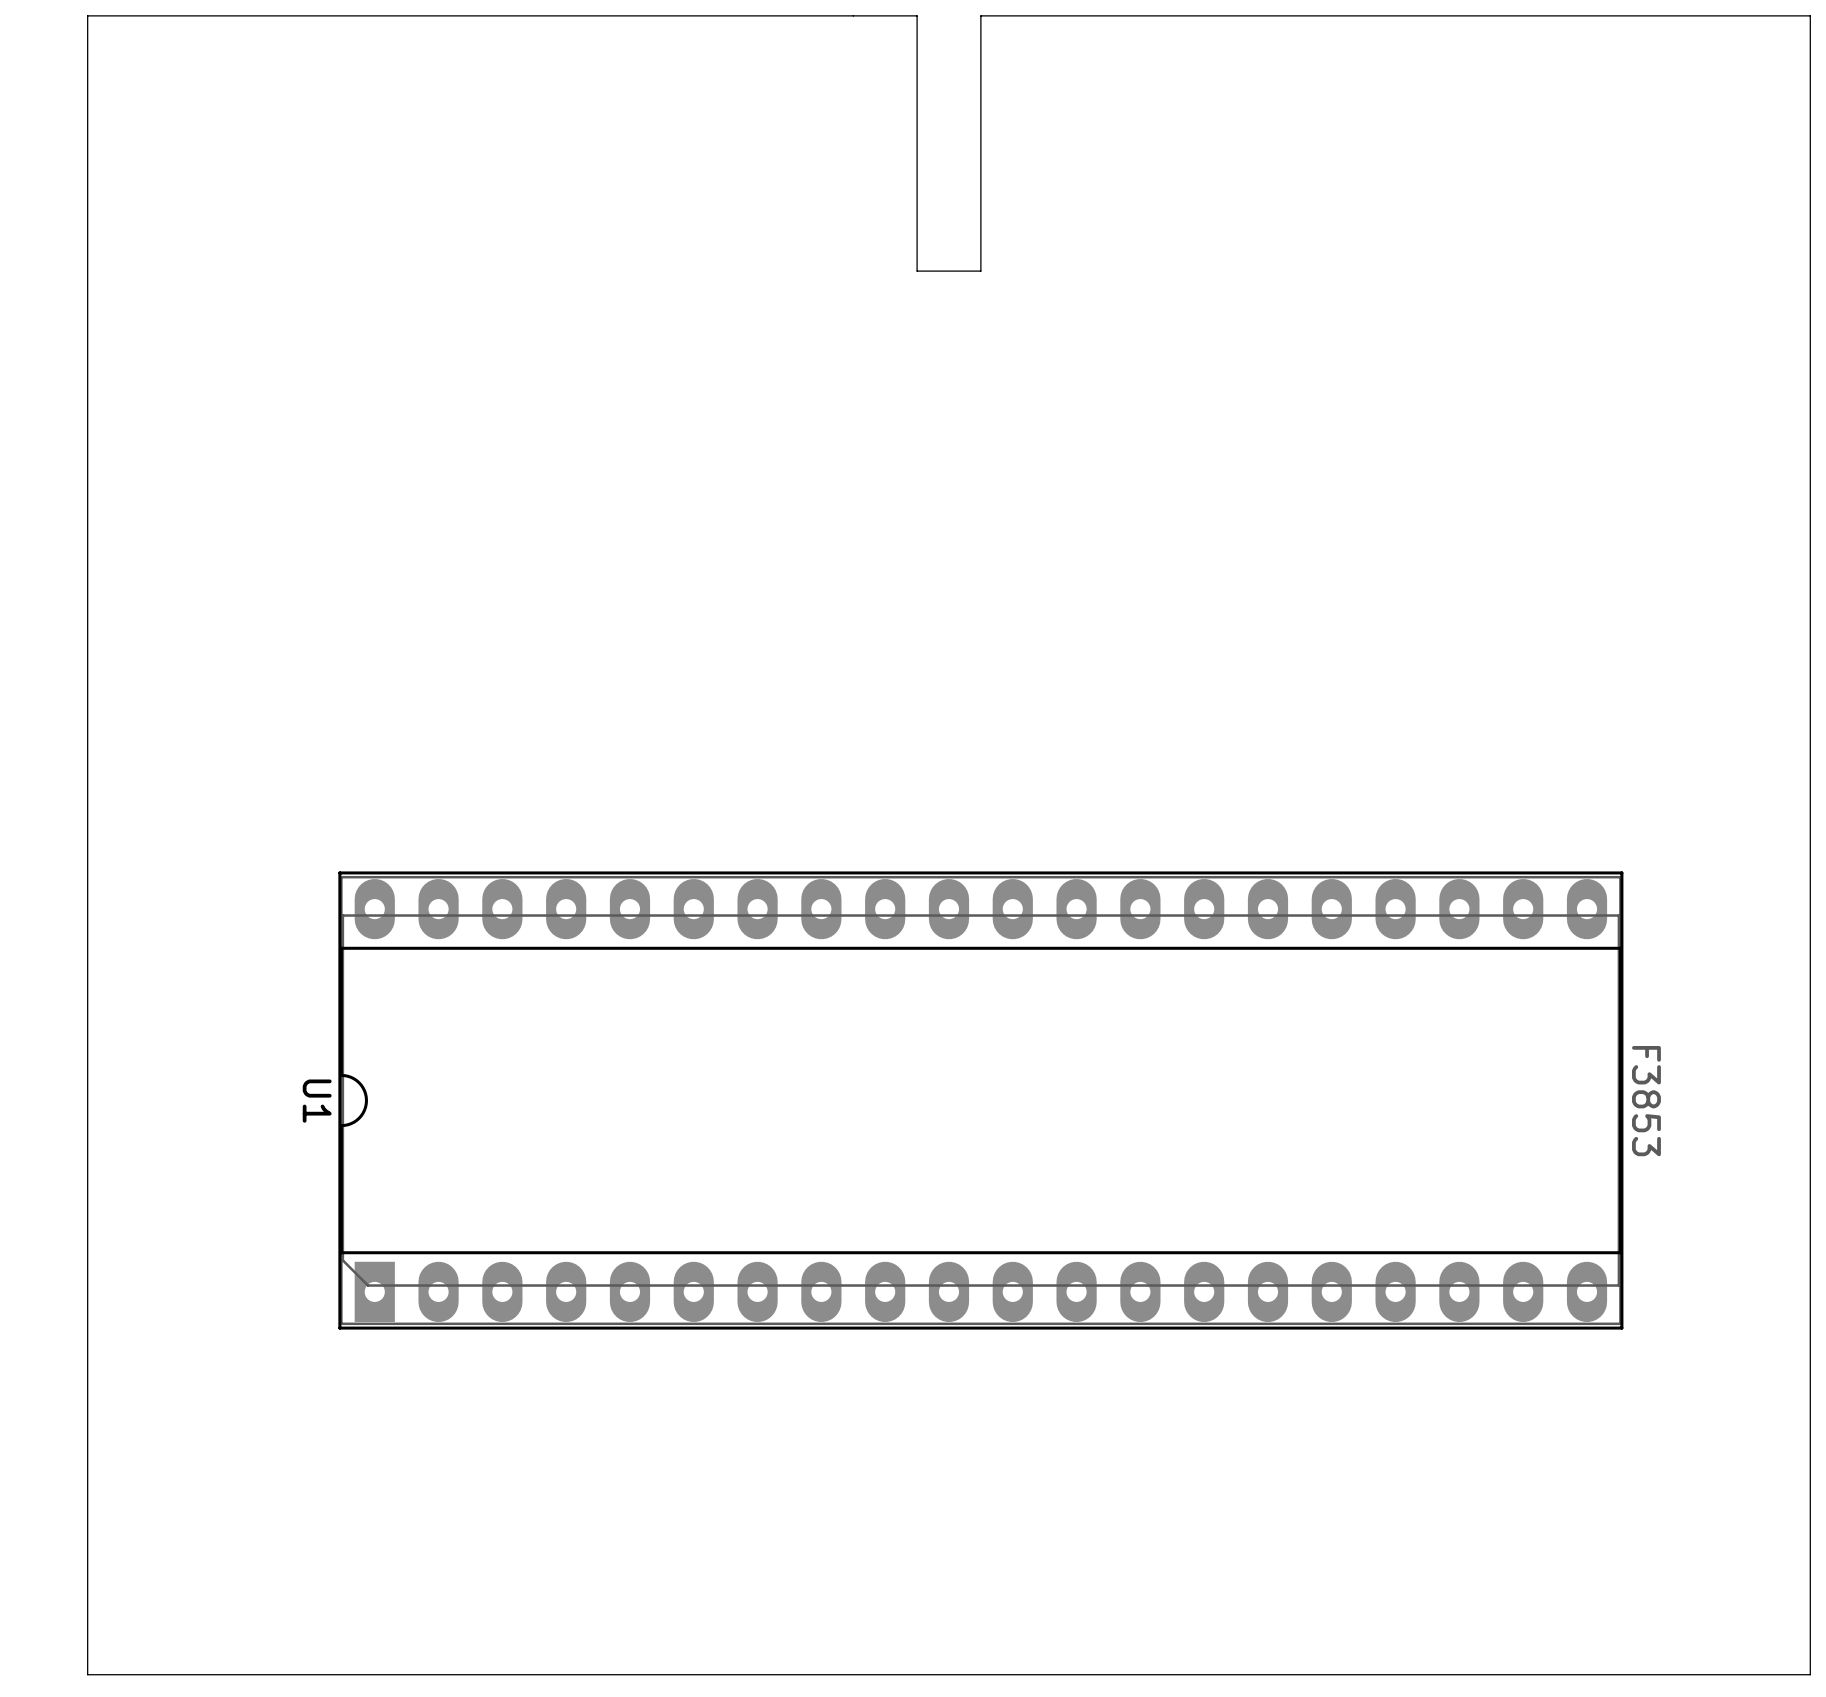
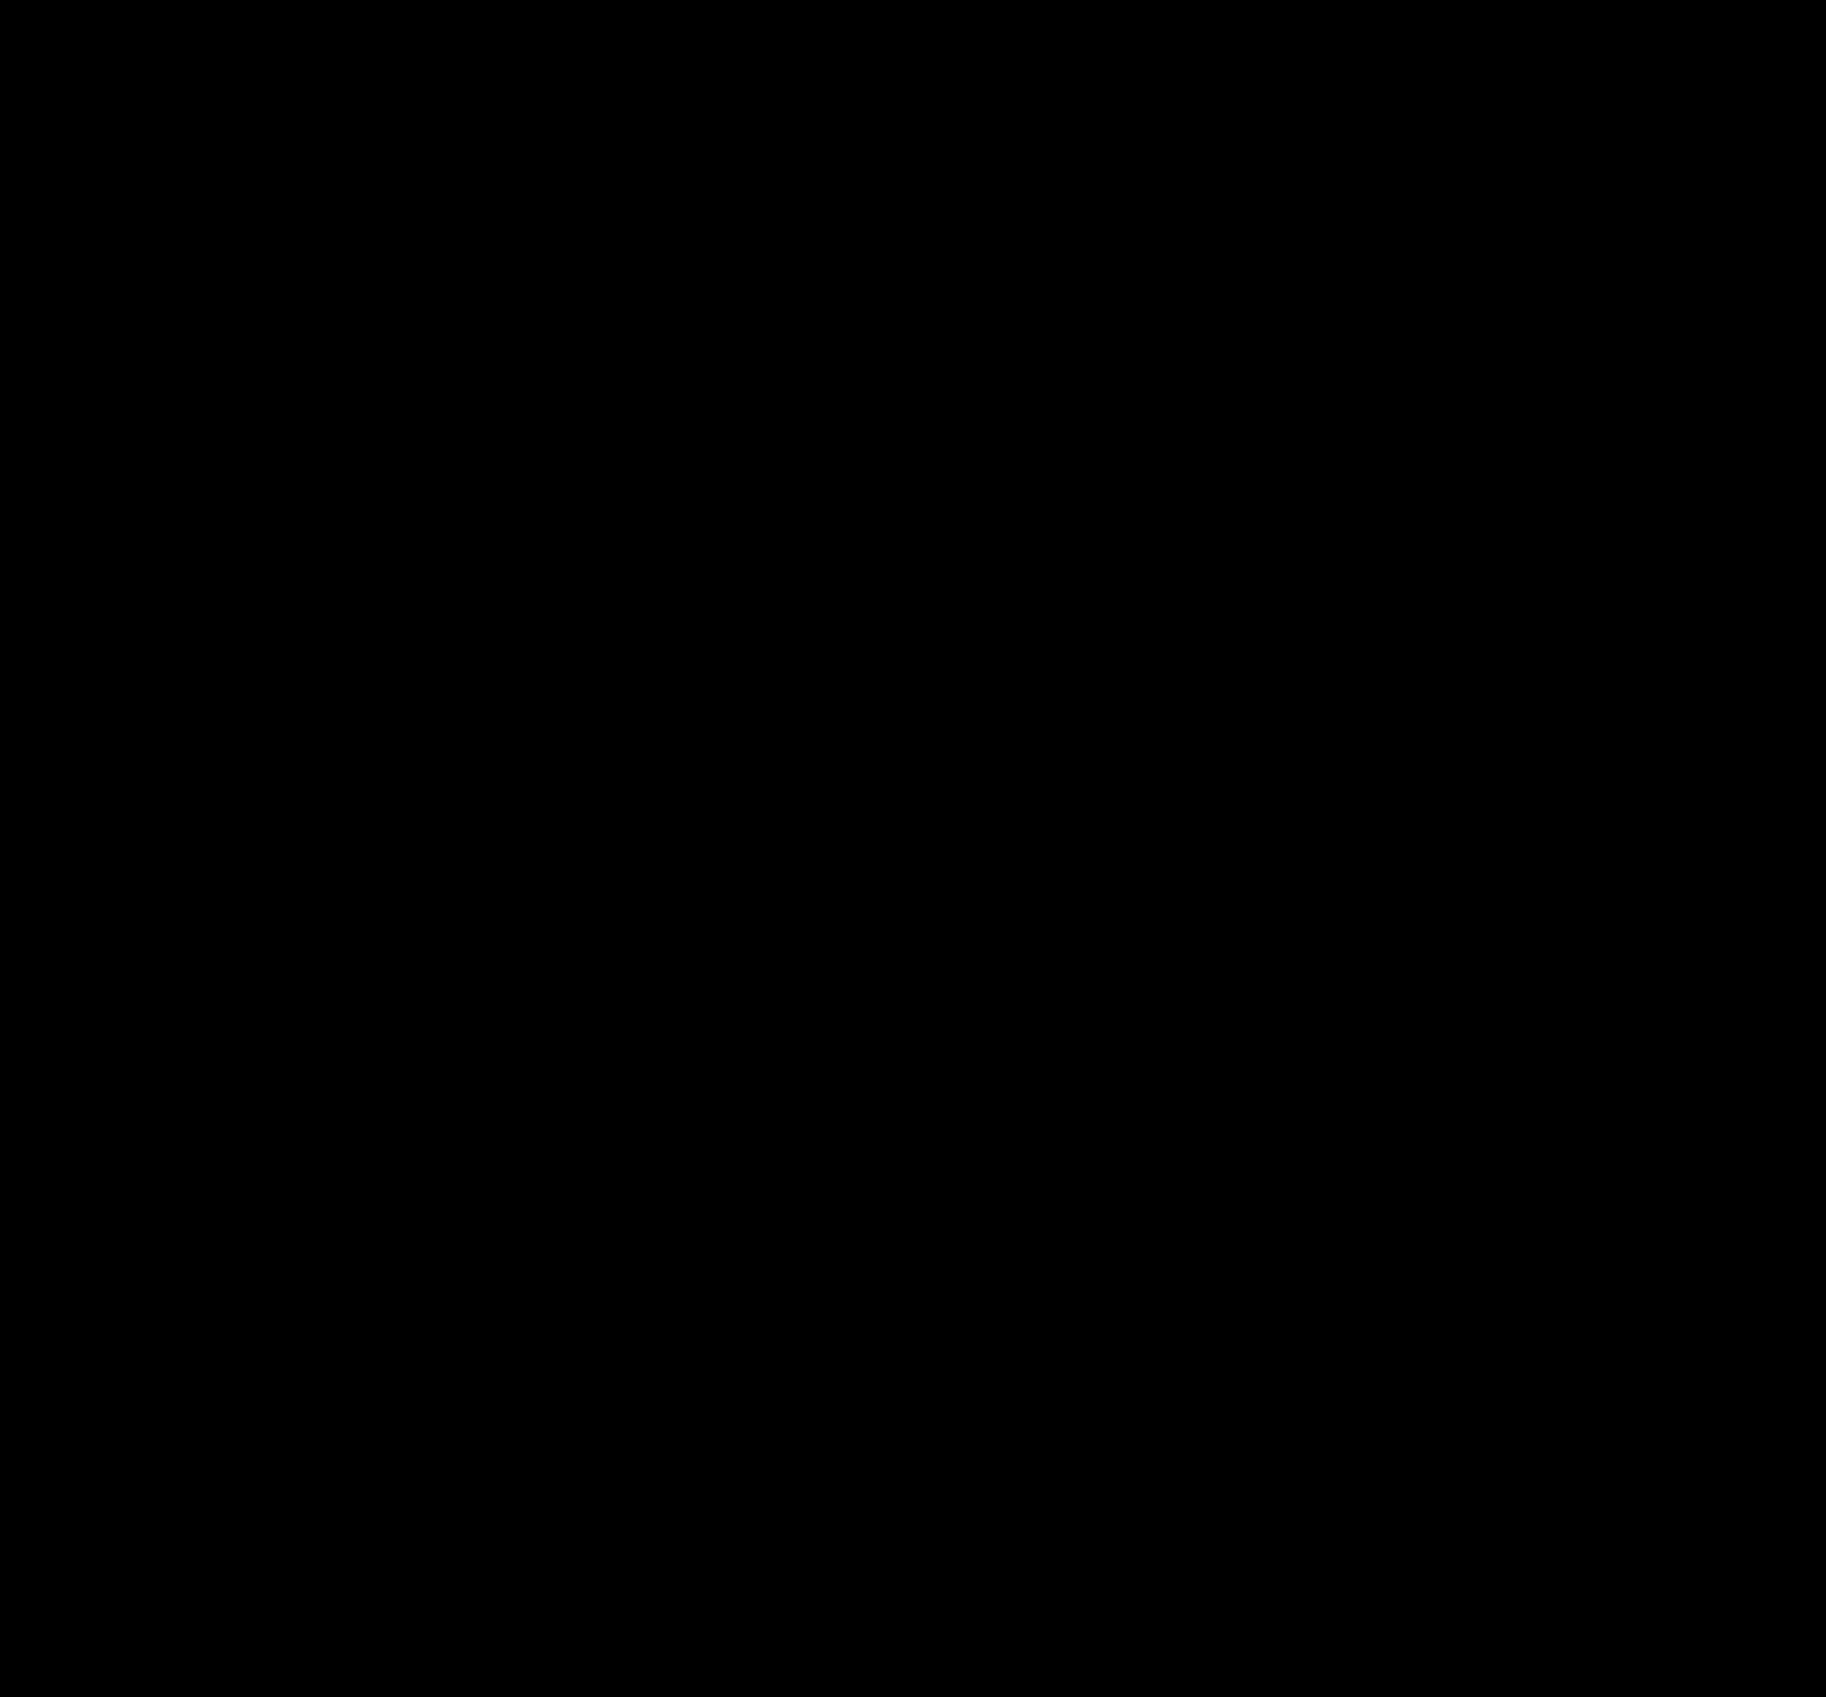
board edge: (1810, 15) (980, 15) (980, 271) (917, 271) (917, 15) (87, 15) (87, 1674) (1810, 1674) (1810, 15) -> none
U1: F3853 (980, 1100) -> none

